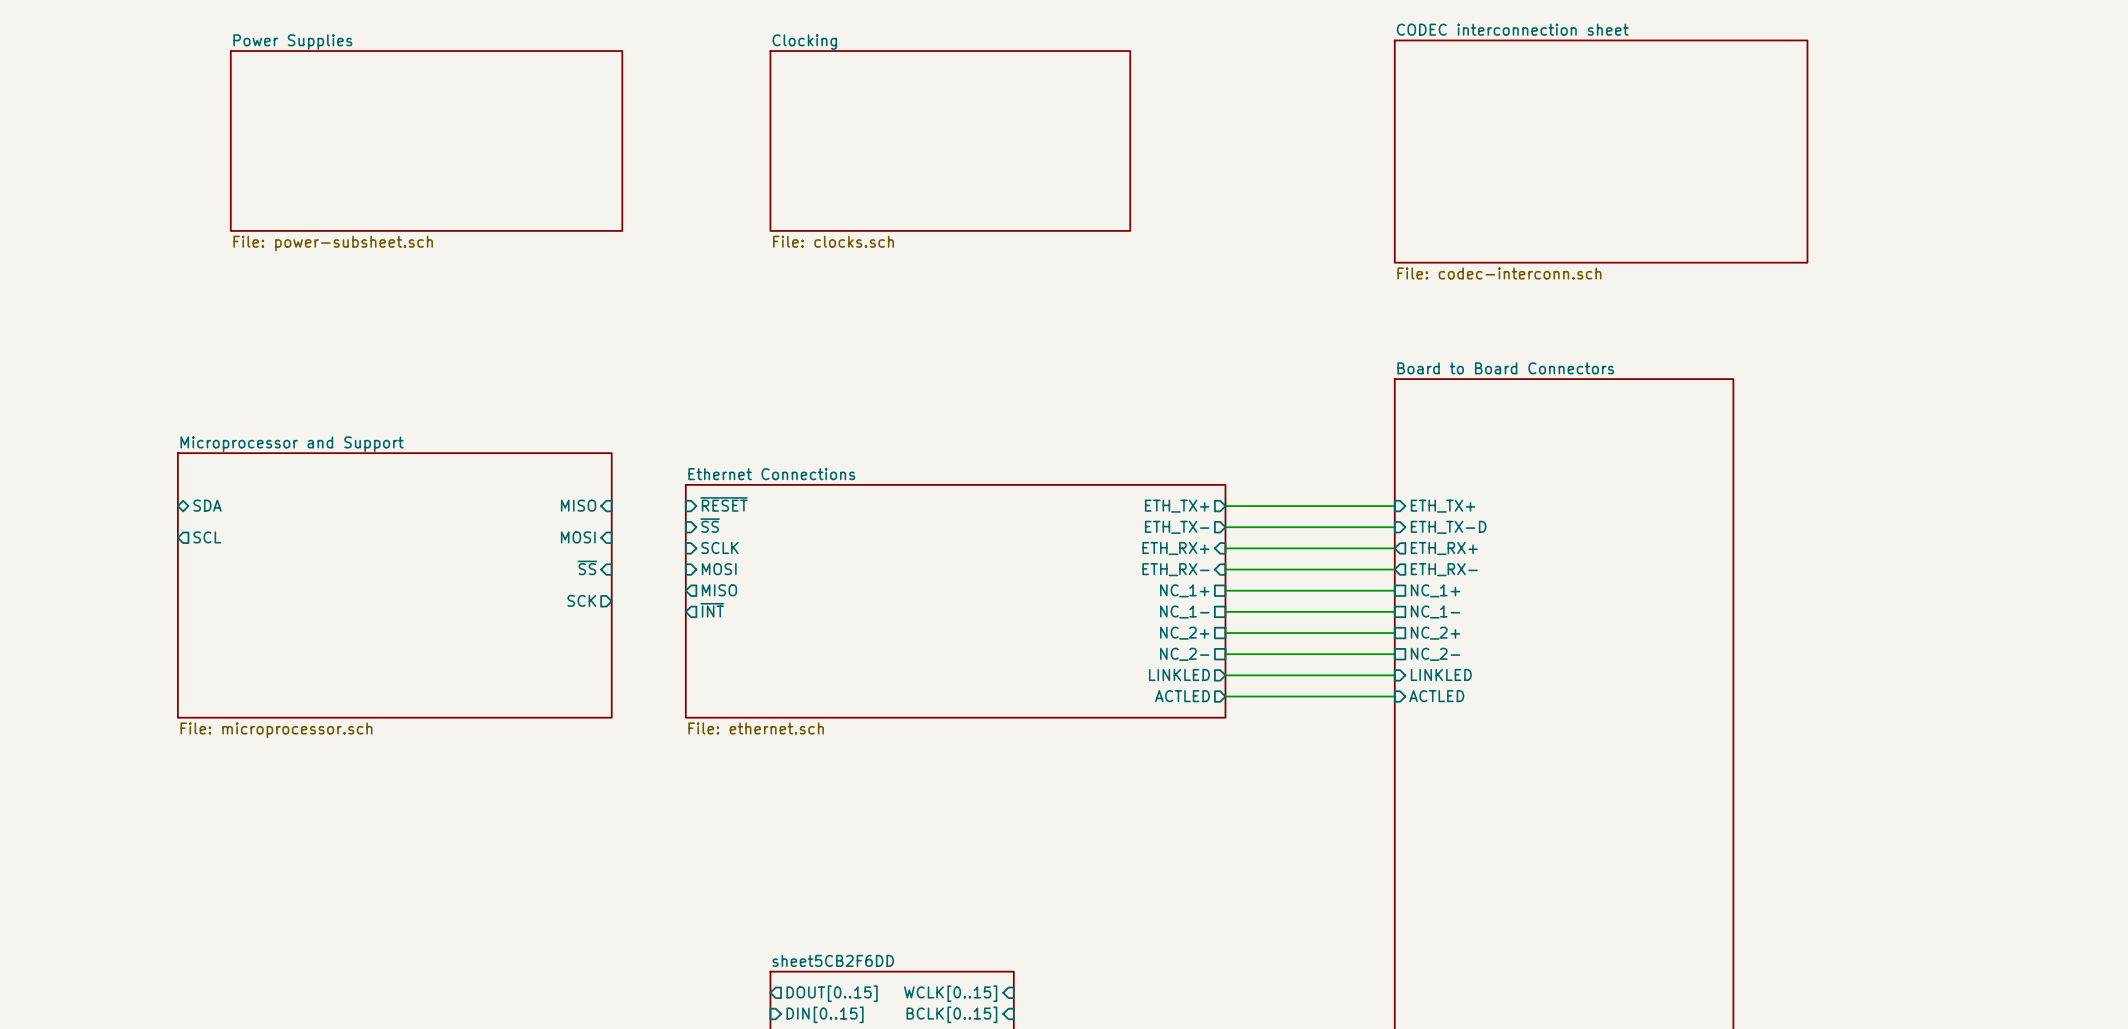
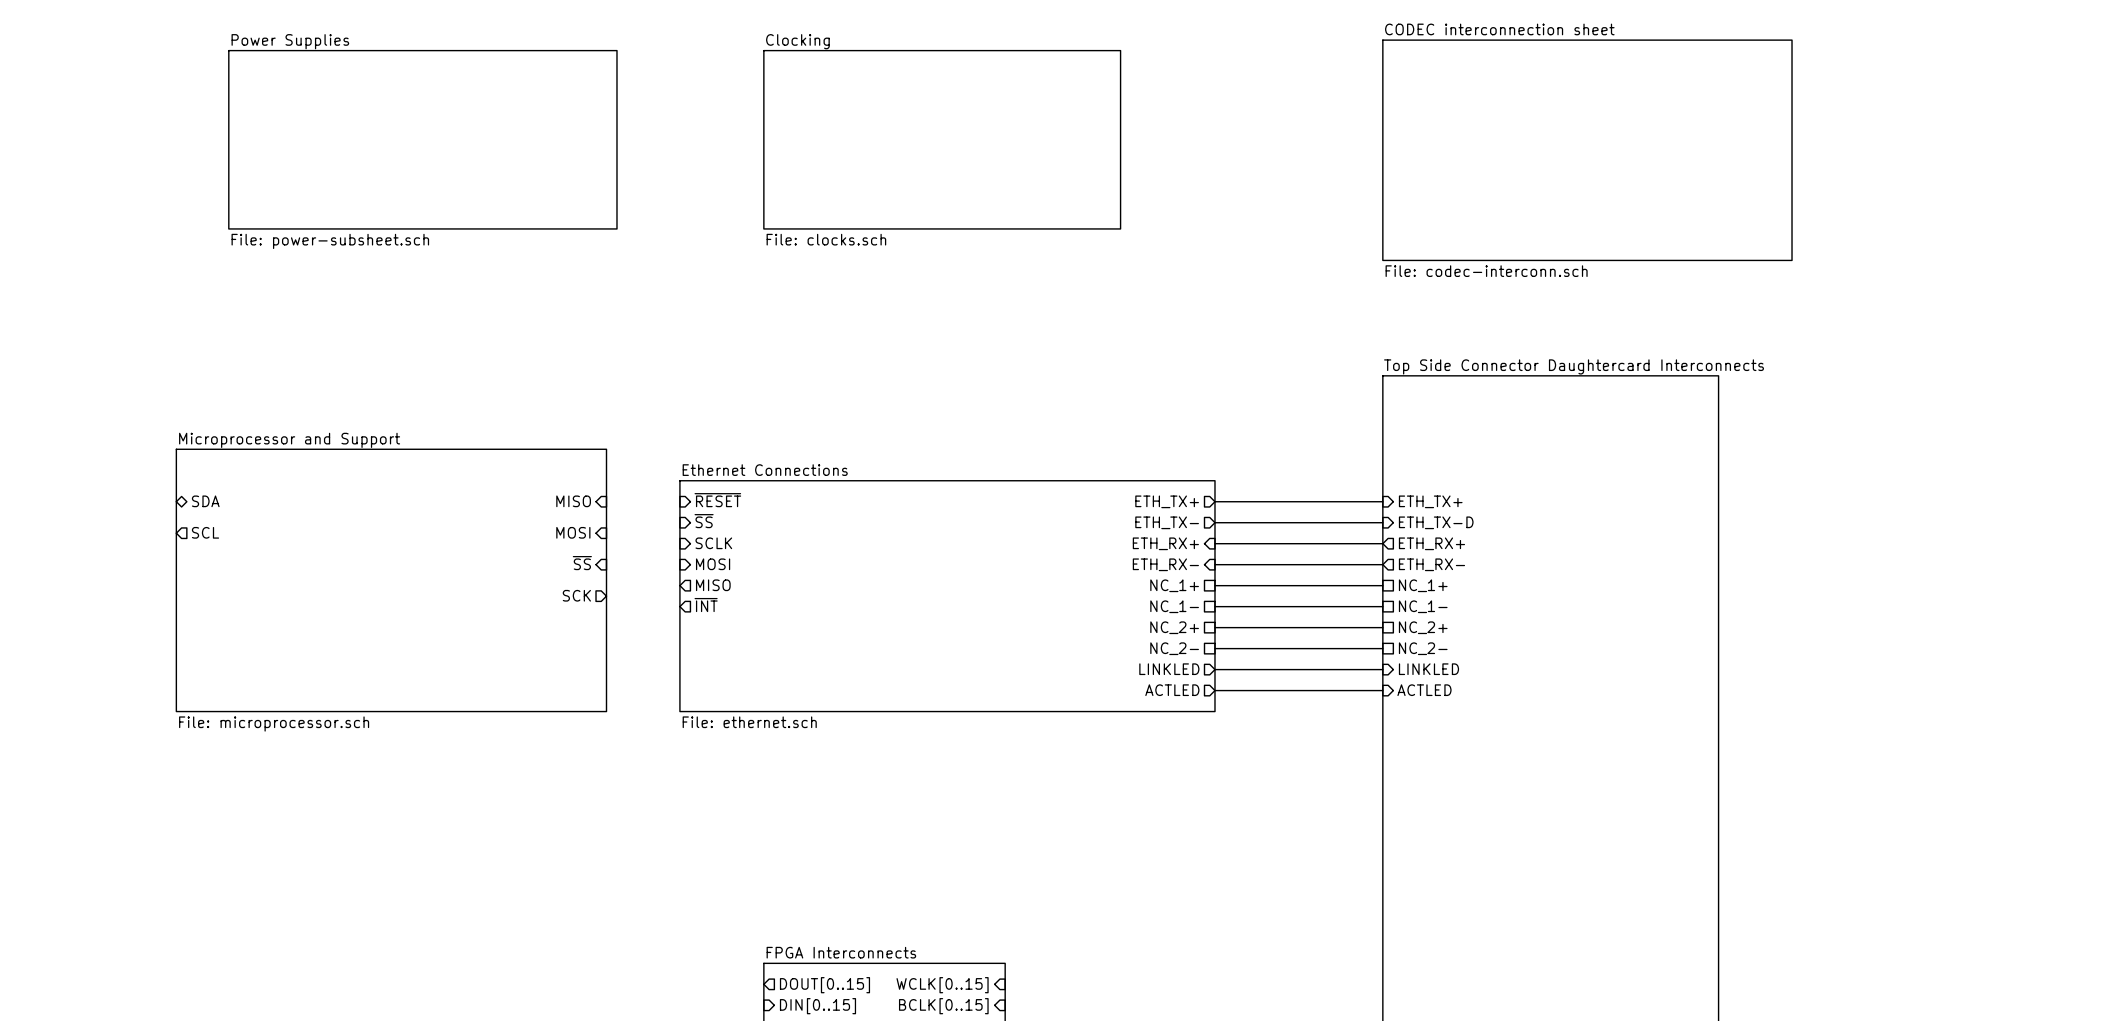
sheet Board to Board Connectors name: Board to Board Connectors (1505, 368) -> Top Side Connector Daughtercard Interconnects (1574, 366)
sheet sheet5CB2F6DD name: sheet5CB2F6DD (833, 960) -> FPGA Interconnects (841, 952)

